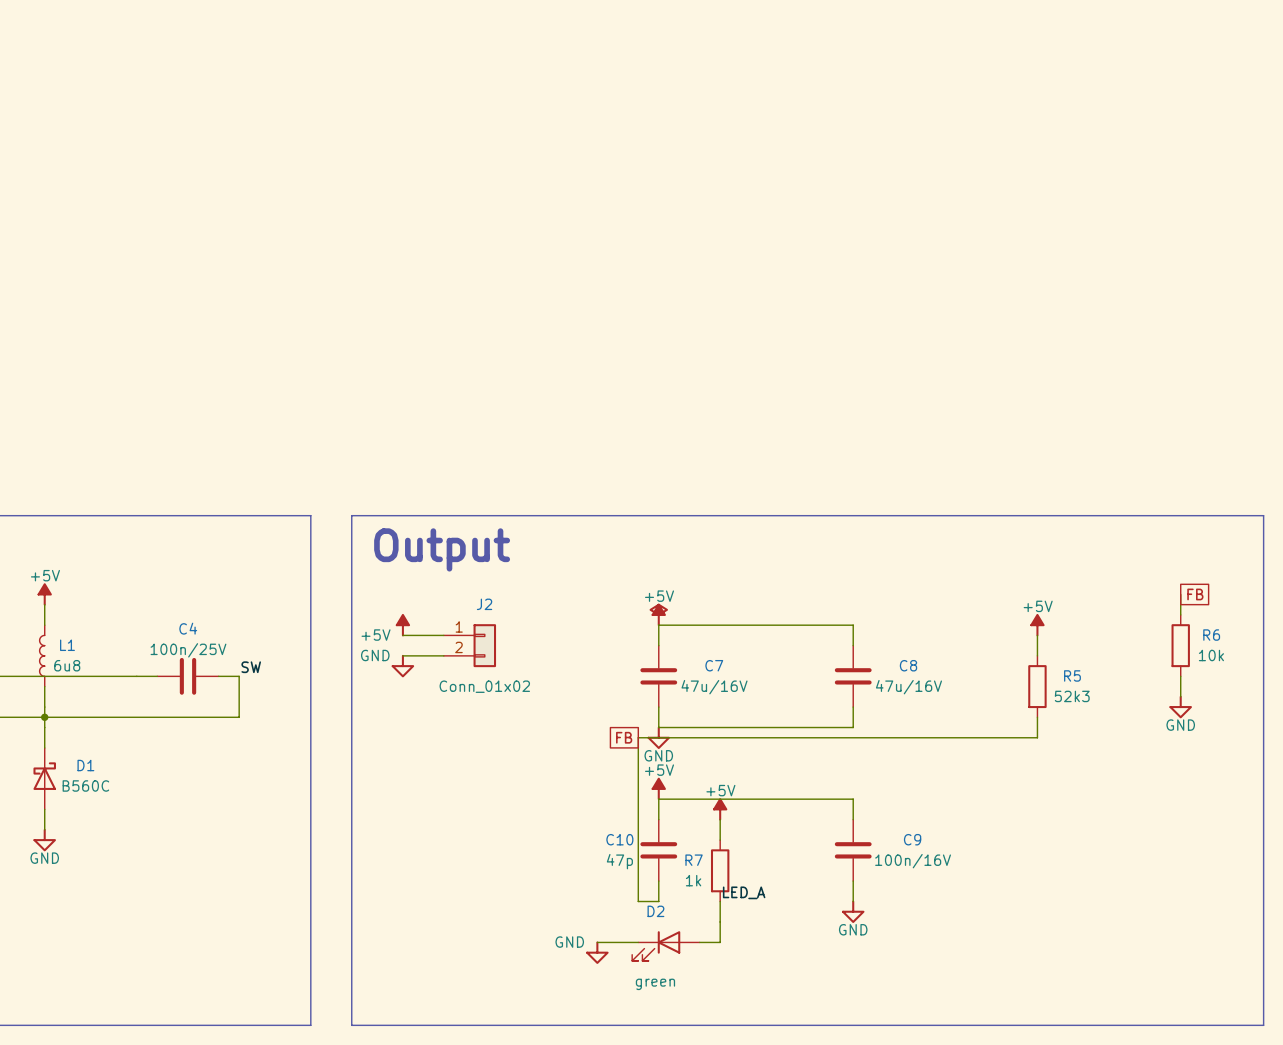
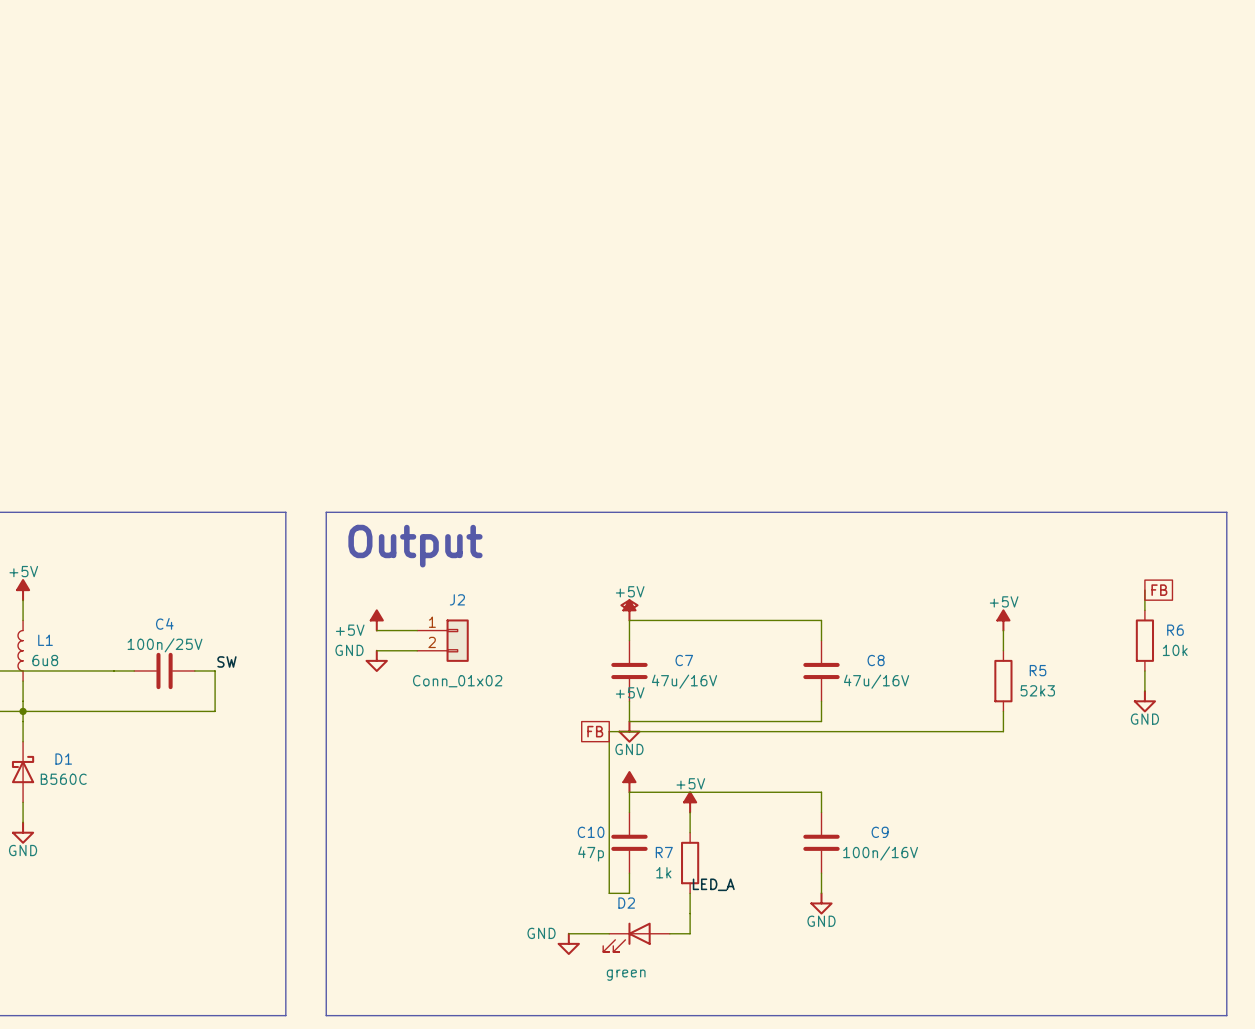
power symbol text position: +5V (659, 770) -> +5V (630, 692)

